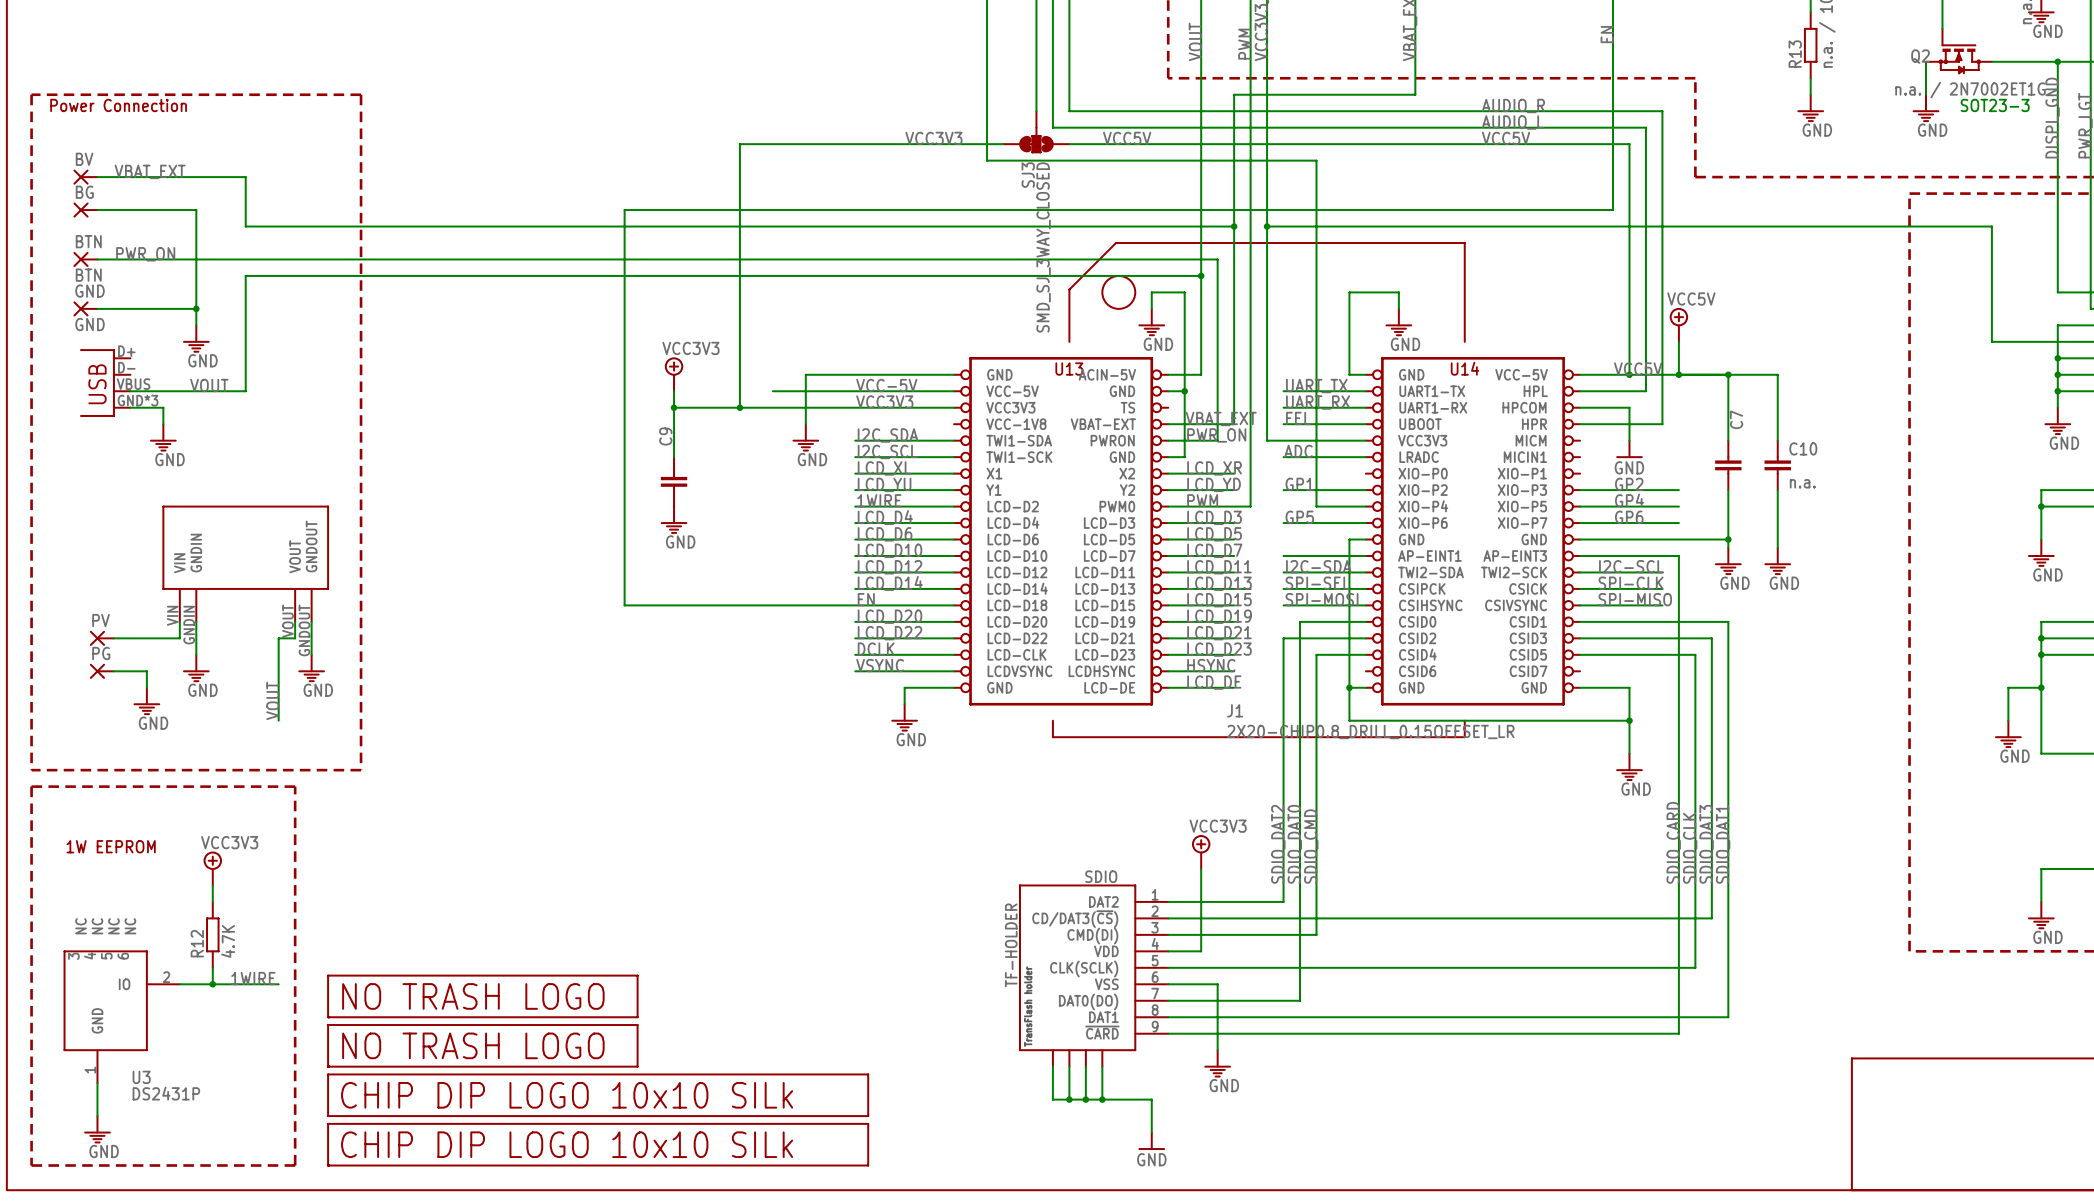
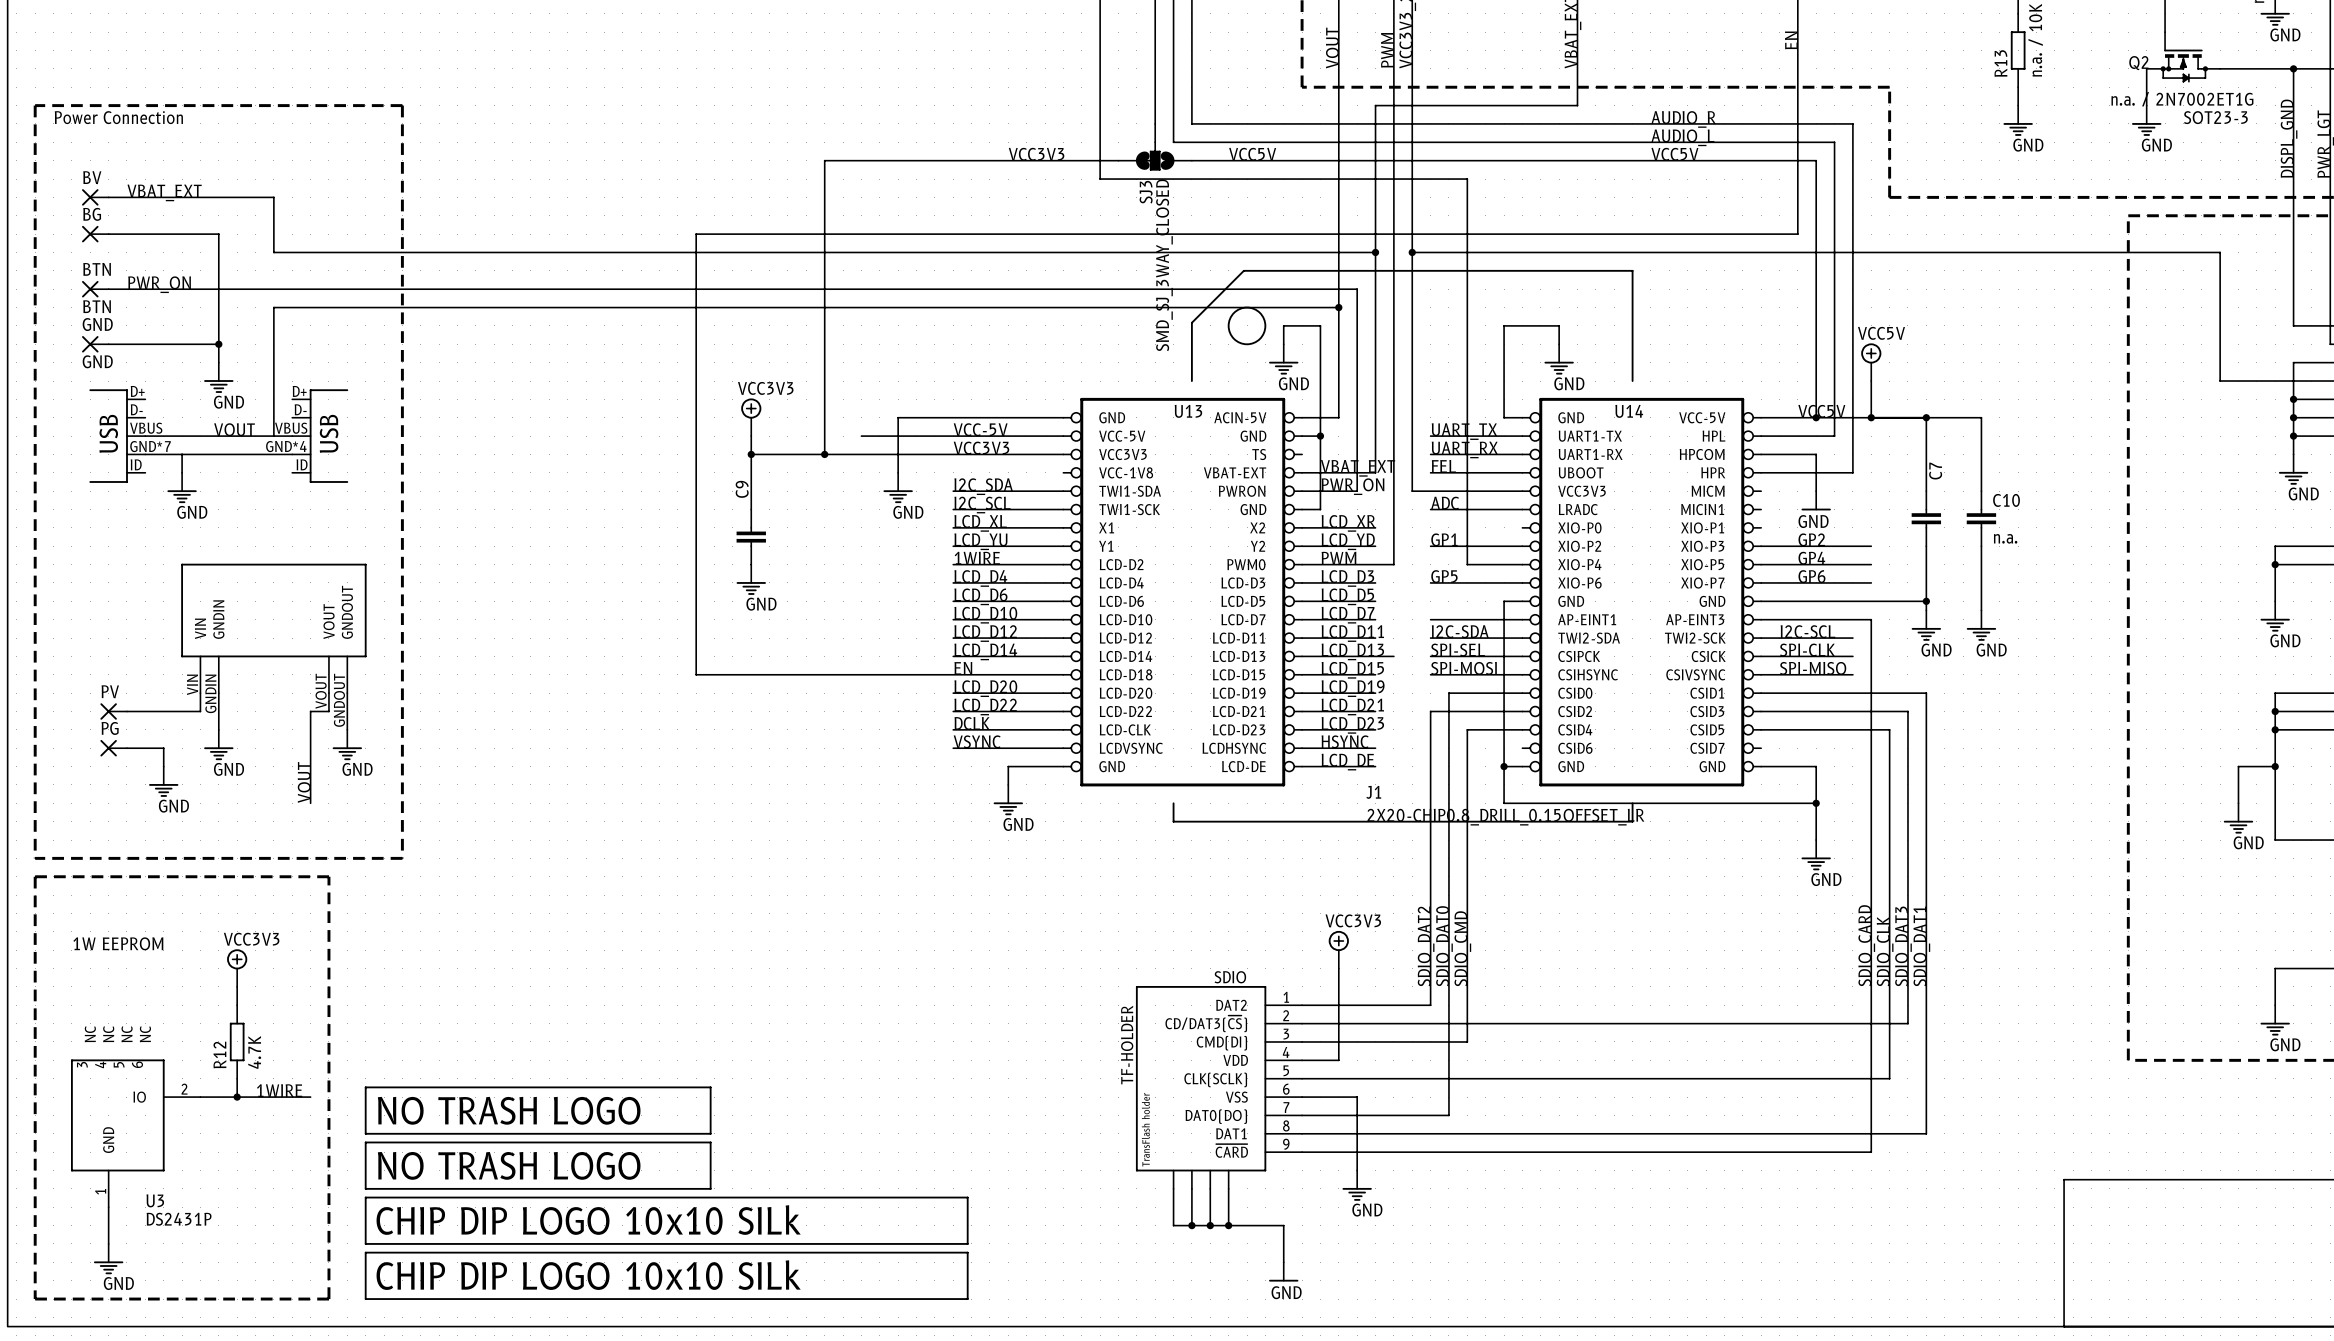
part: (105, 383) -> none
part: none -> (117, 436)
wire: none -> (273, 436) (292, 436)
part: none -> (320, 436)
wire: none -> (182, 454) (292, 454)

